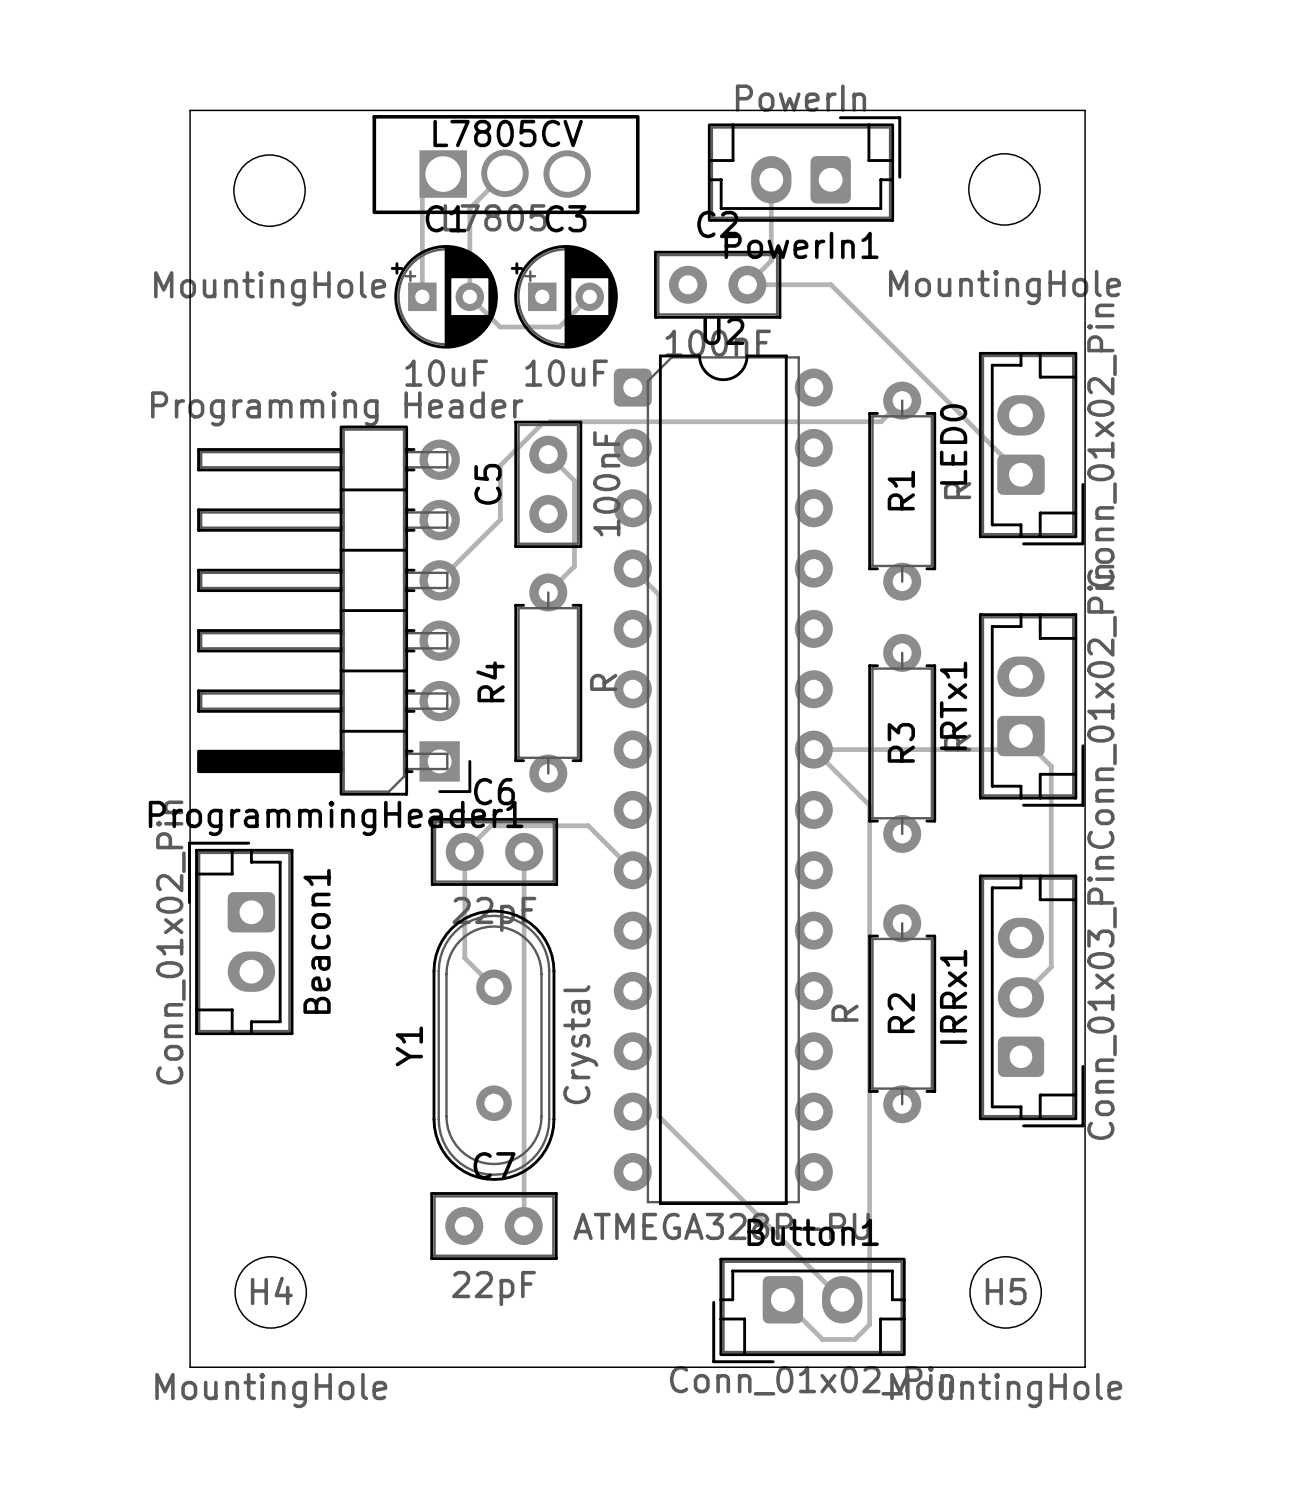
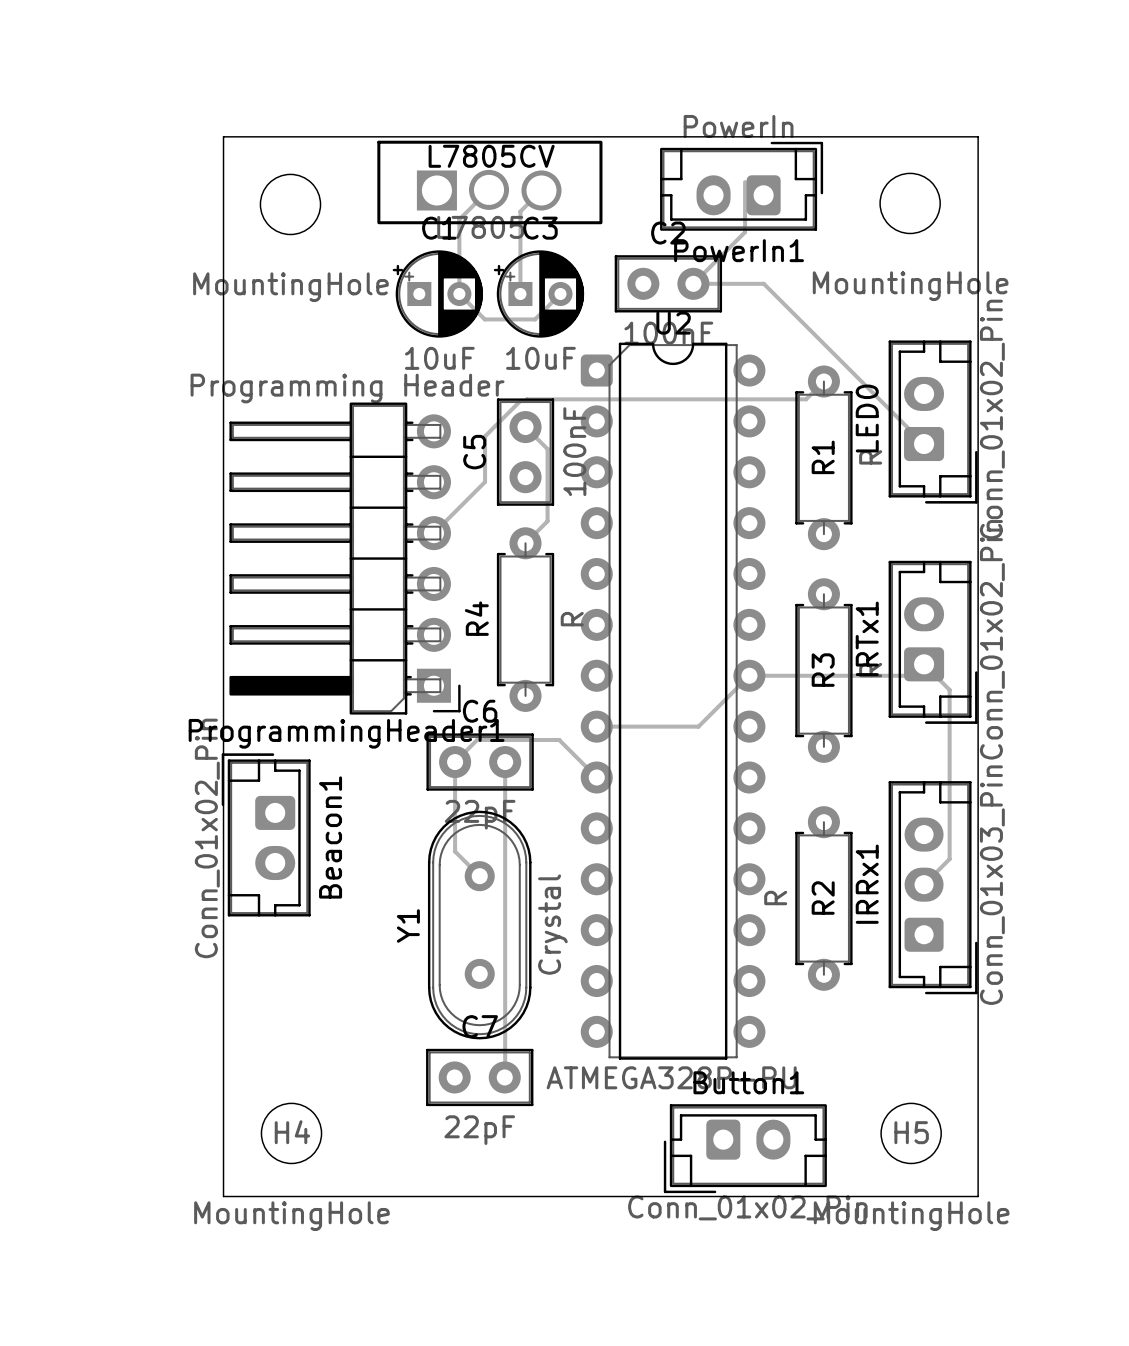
track: (443, 174) (422, 194) (422, 296) -> none
track: none -> (541, 190) (520, 211) (520, 294)
track: (771, 179) (771, 260) -> (745, 182) (745, 232) (713, 263)
track: (632, 568) (658, 594) (658, 1116) (842, 1299) -> none
track: (813, 749) (869, 805) (869, 1324) (854, 1339) (822, 1339) (782, 1299) -> (749, 675) (698, 726) (596, 726)

